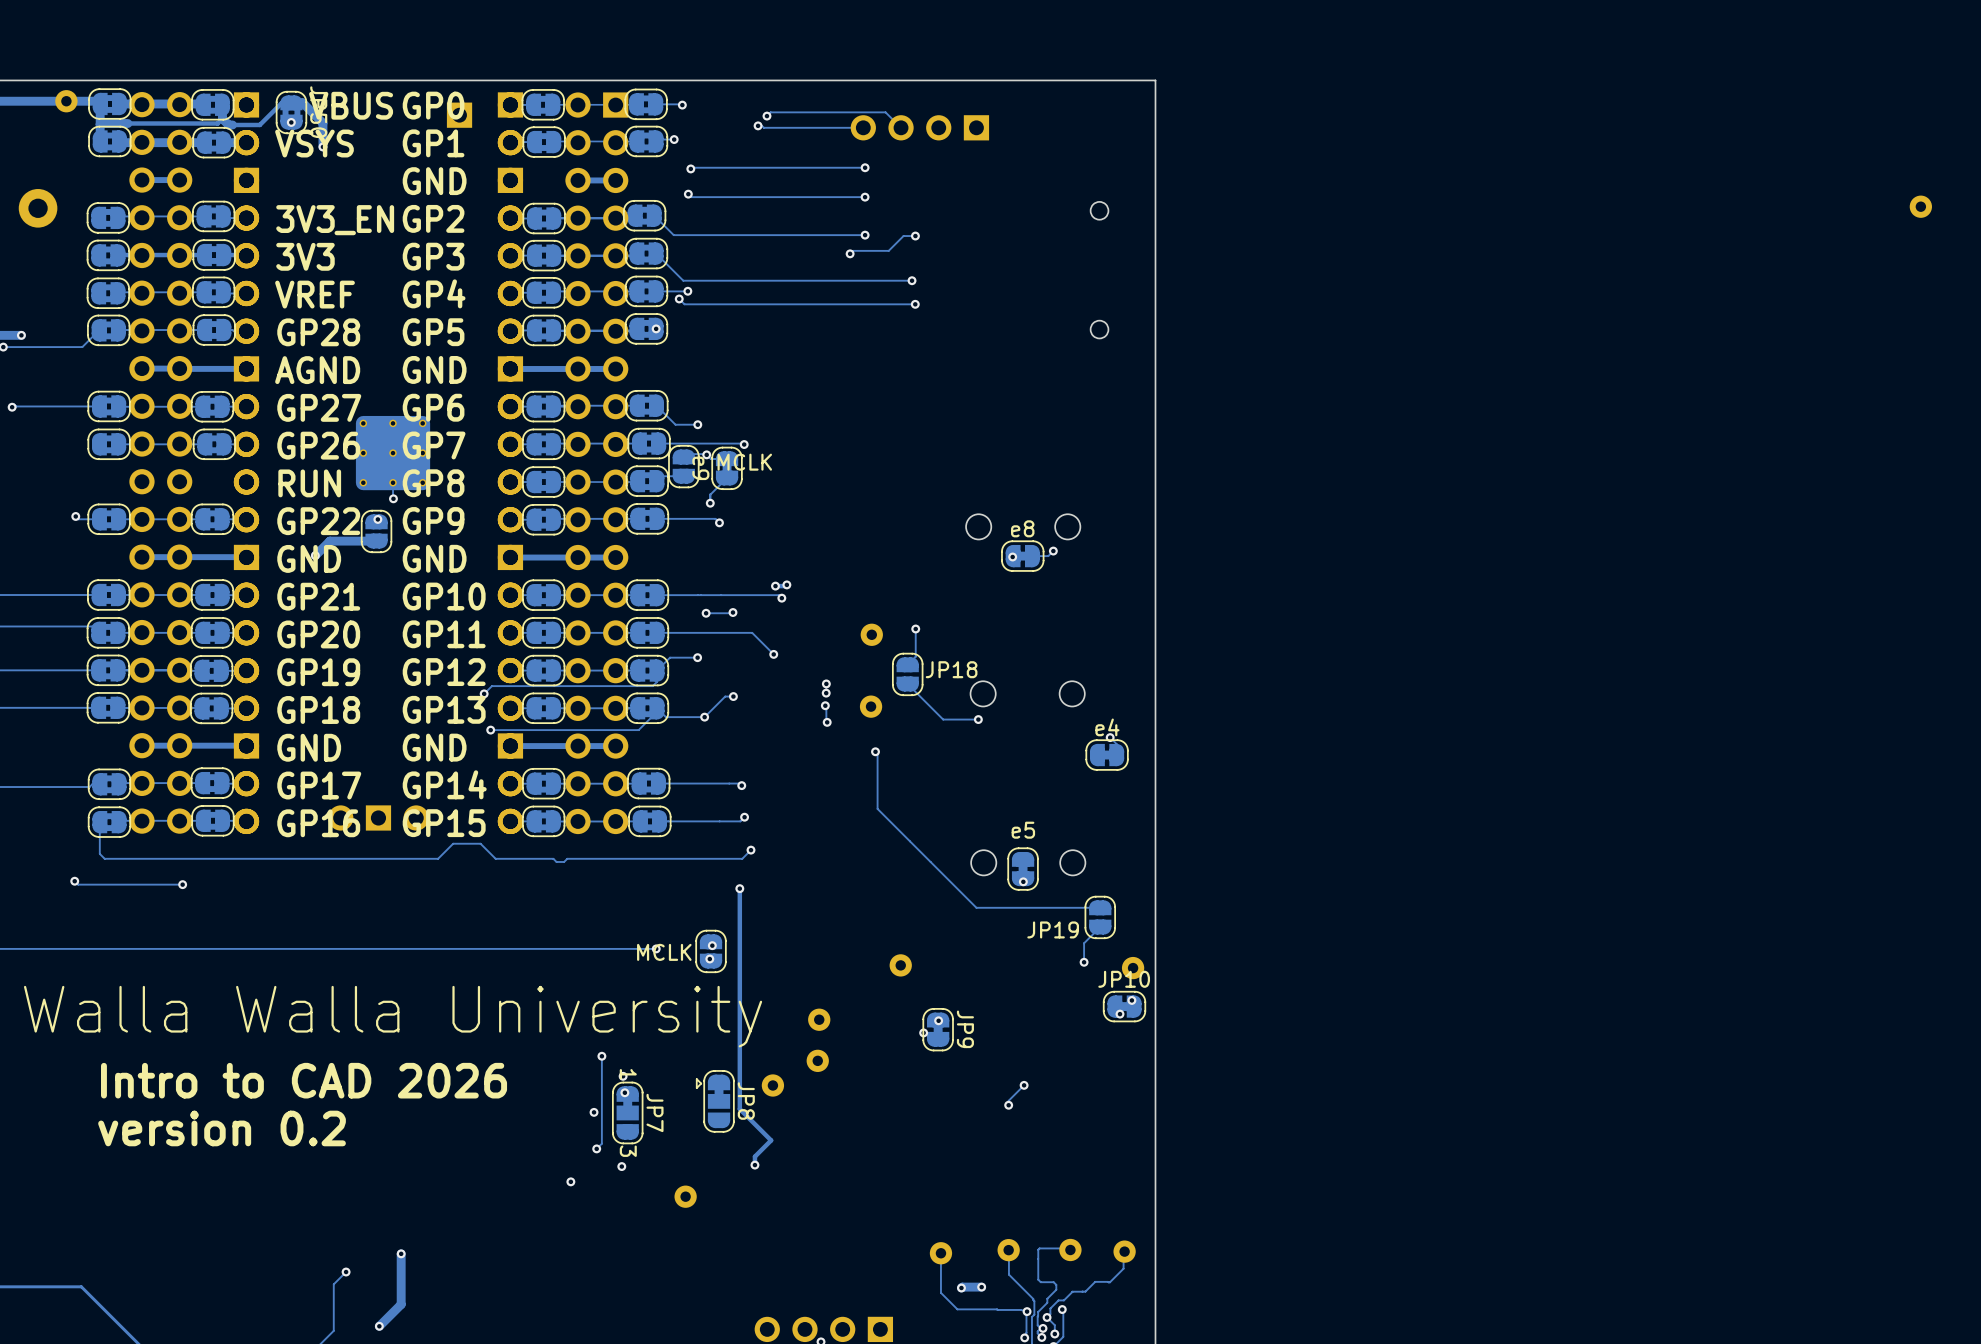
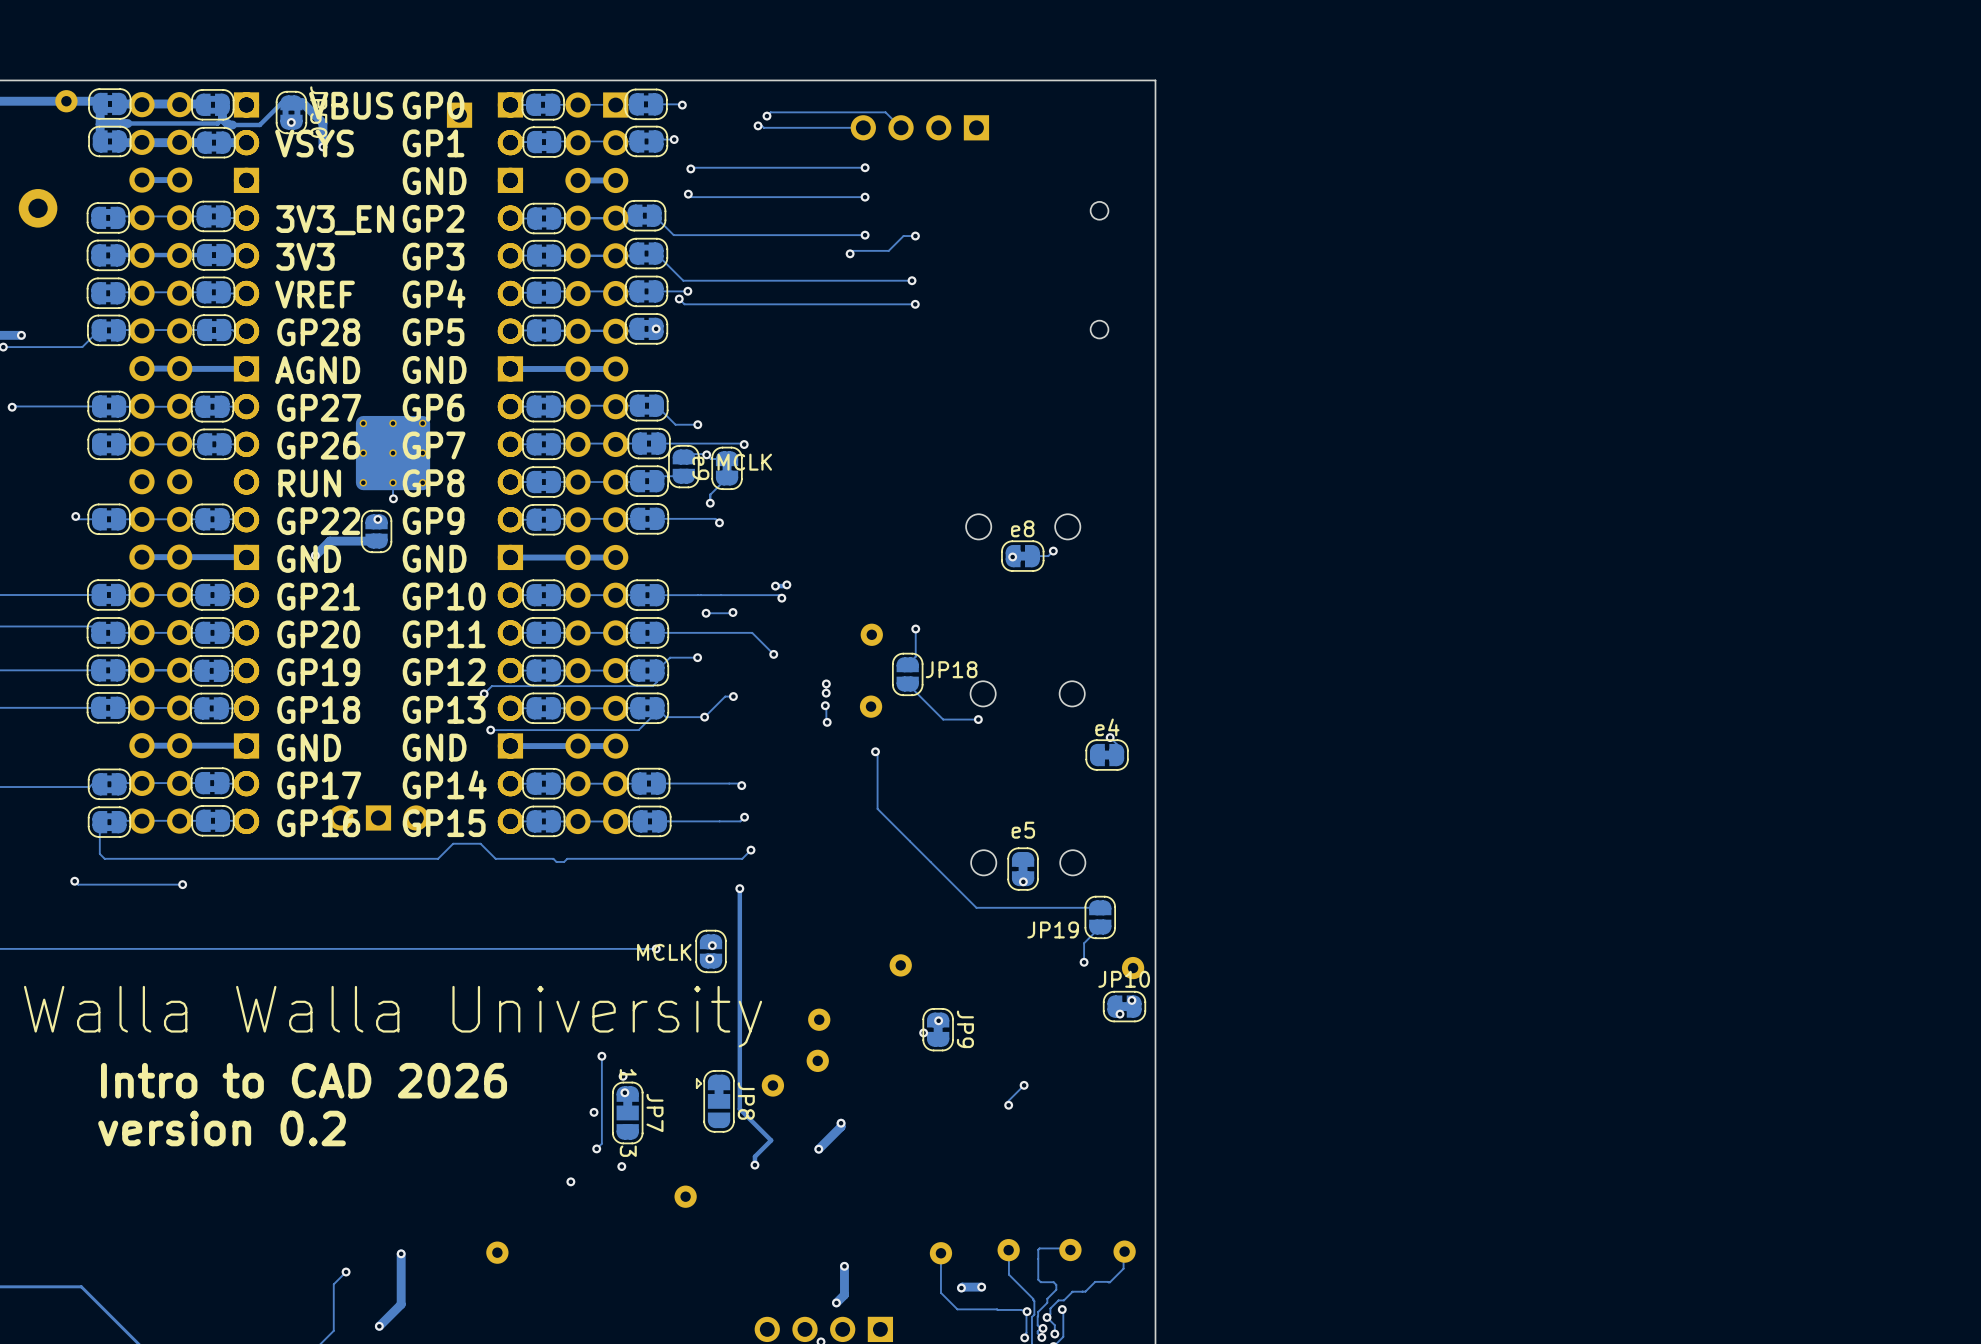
part: (1920, 206) -> none
track: none -> (841, 1123) (841, 1126) (818, 1149)
via: none -> (841, 1123)
via: none -> (818, 1149)
part: none -> (497, 1252)
track: none -> (844, 1266) (844, 1294) (836, 1302)
via: none -> (844, 1266)
via: none -> (836, 1302)

